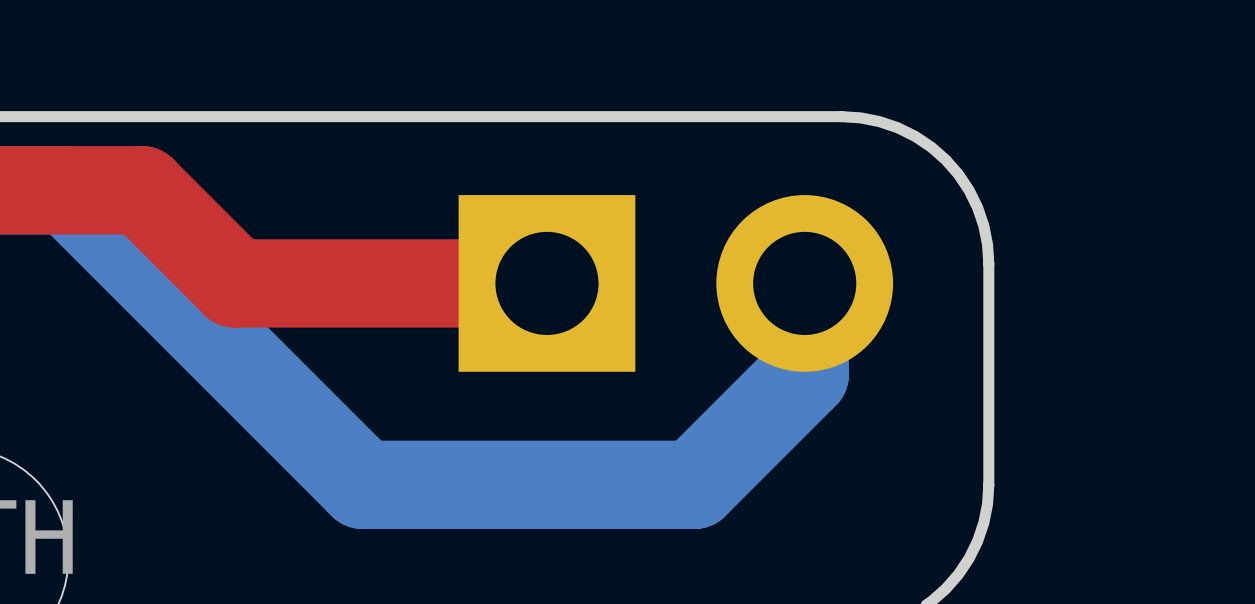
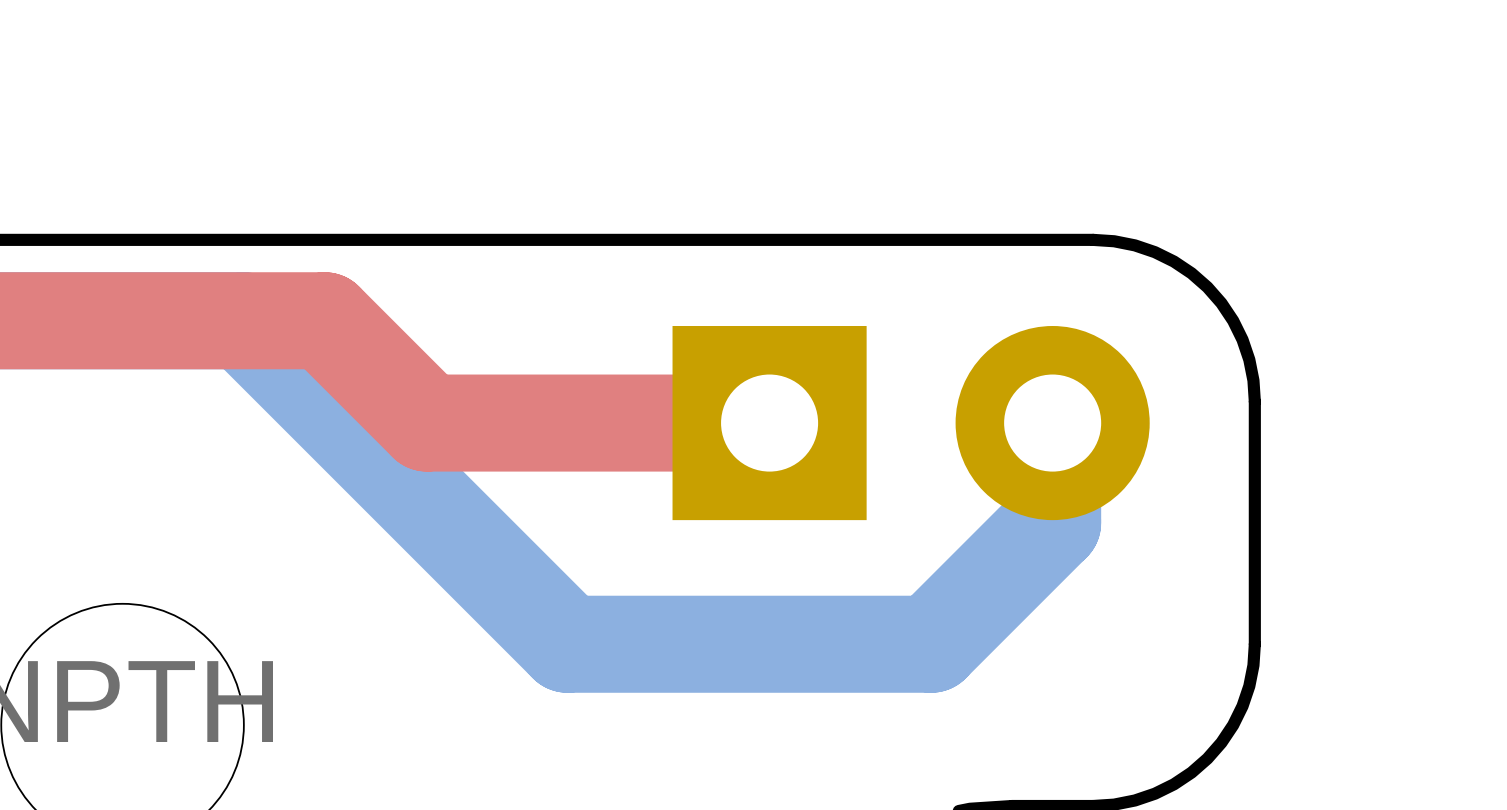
part footprint: [458, 195, 894, 372] -> [672, 326, 1150, 521]

